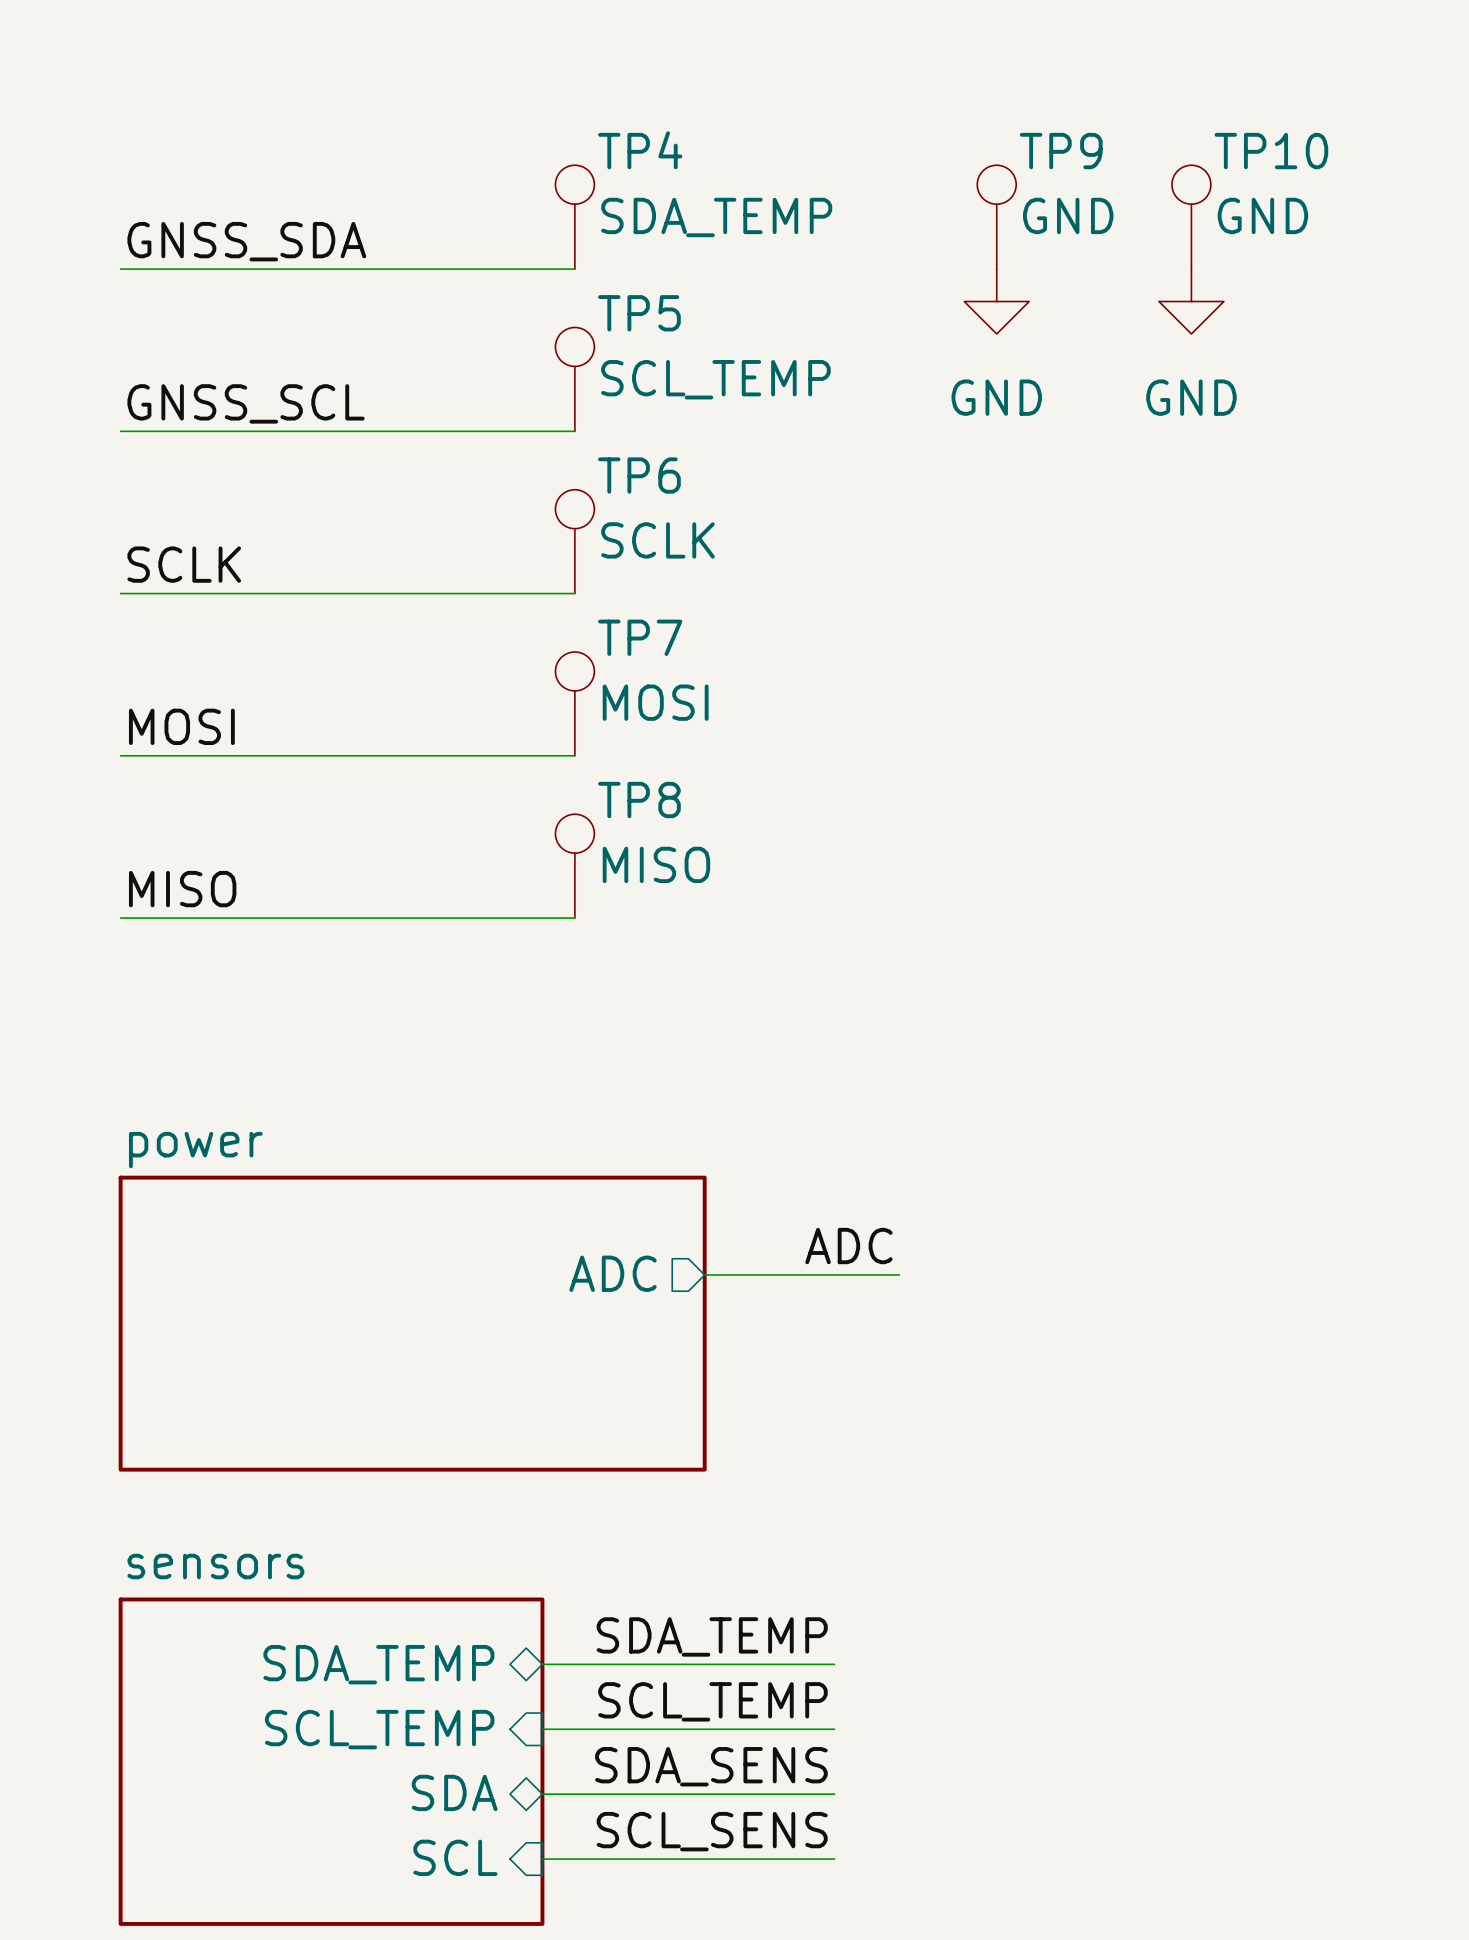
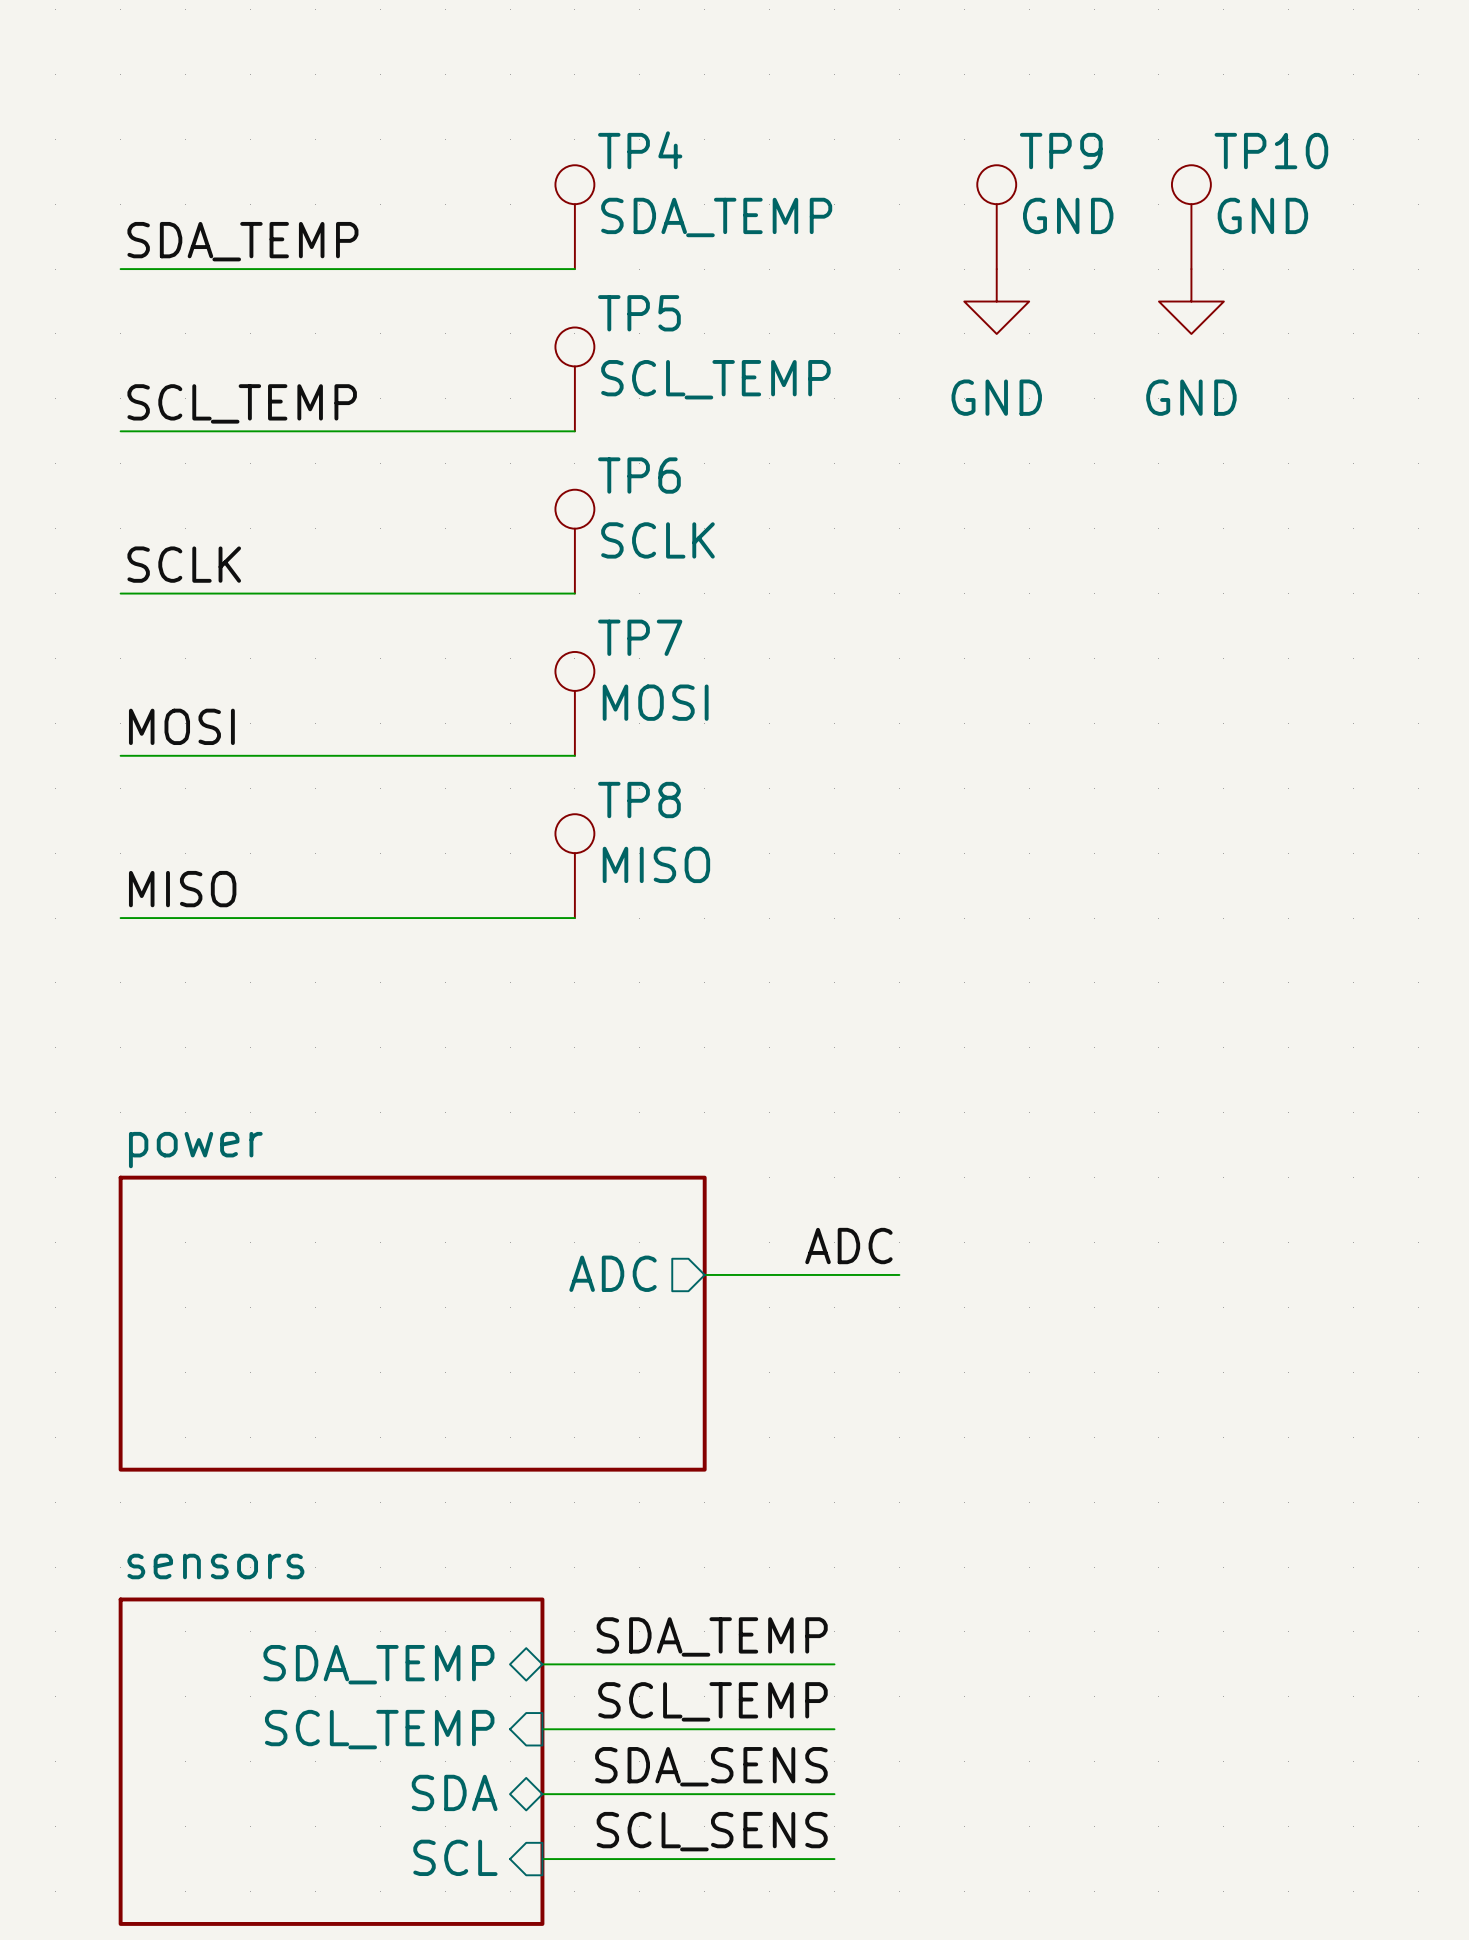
label: GNSS_SDA (246, 241) -> SDA_TEMP (242, 241)
label: GNSS_SCL (246, 403) -> SCL_TEMP (242, 403)

